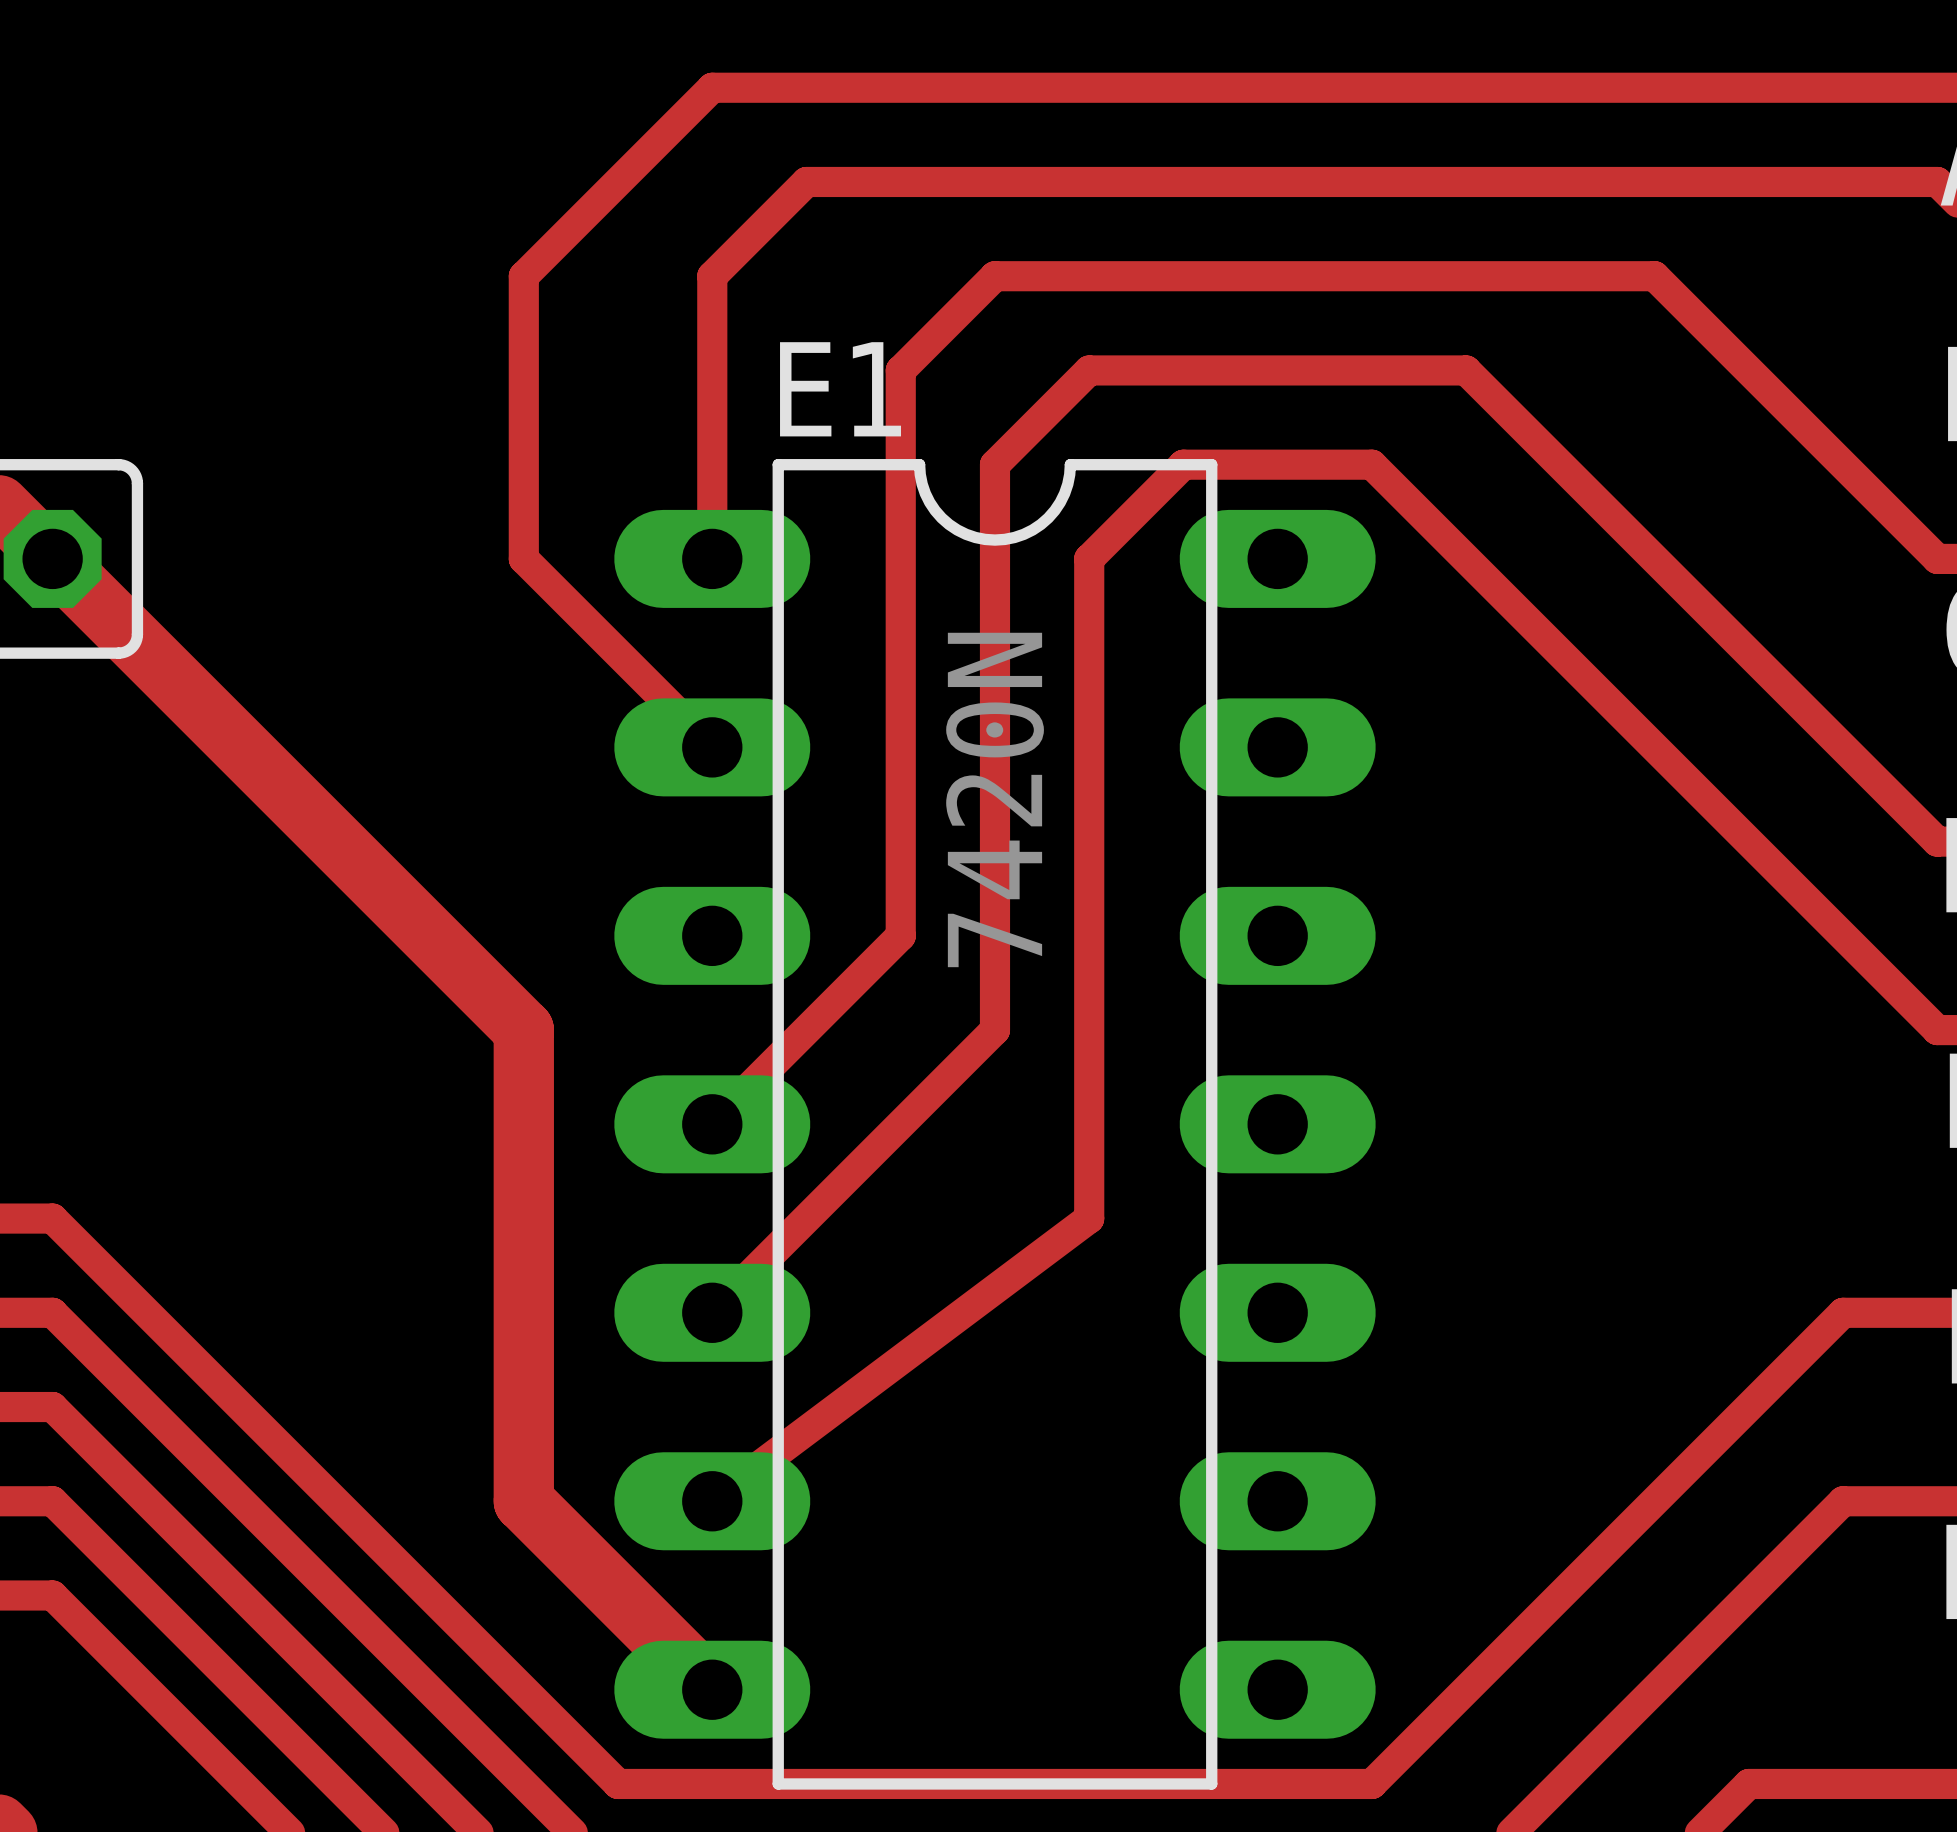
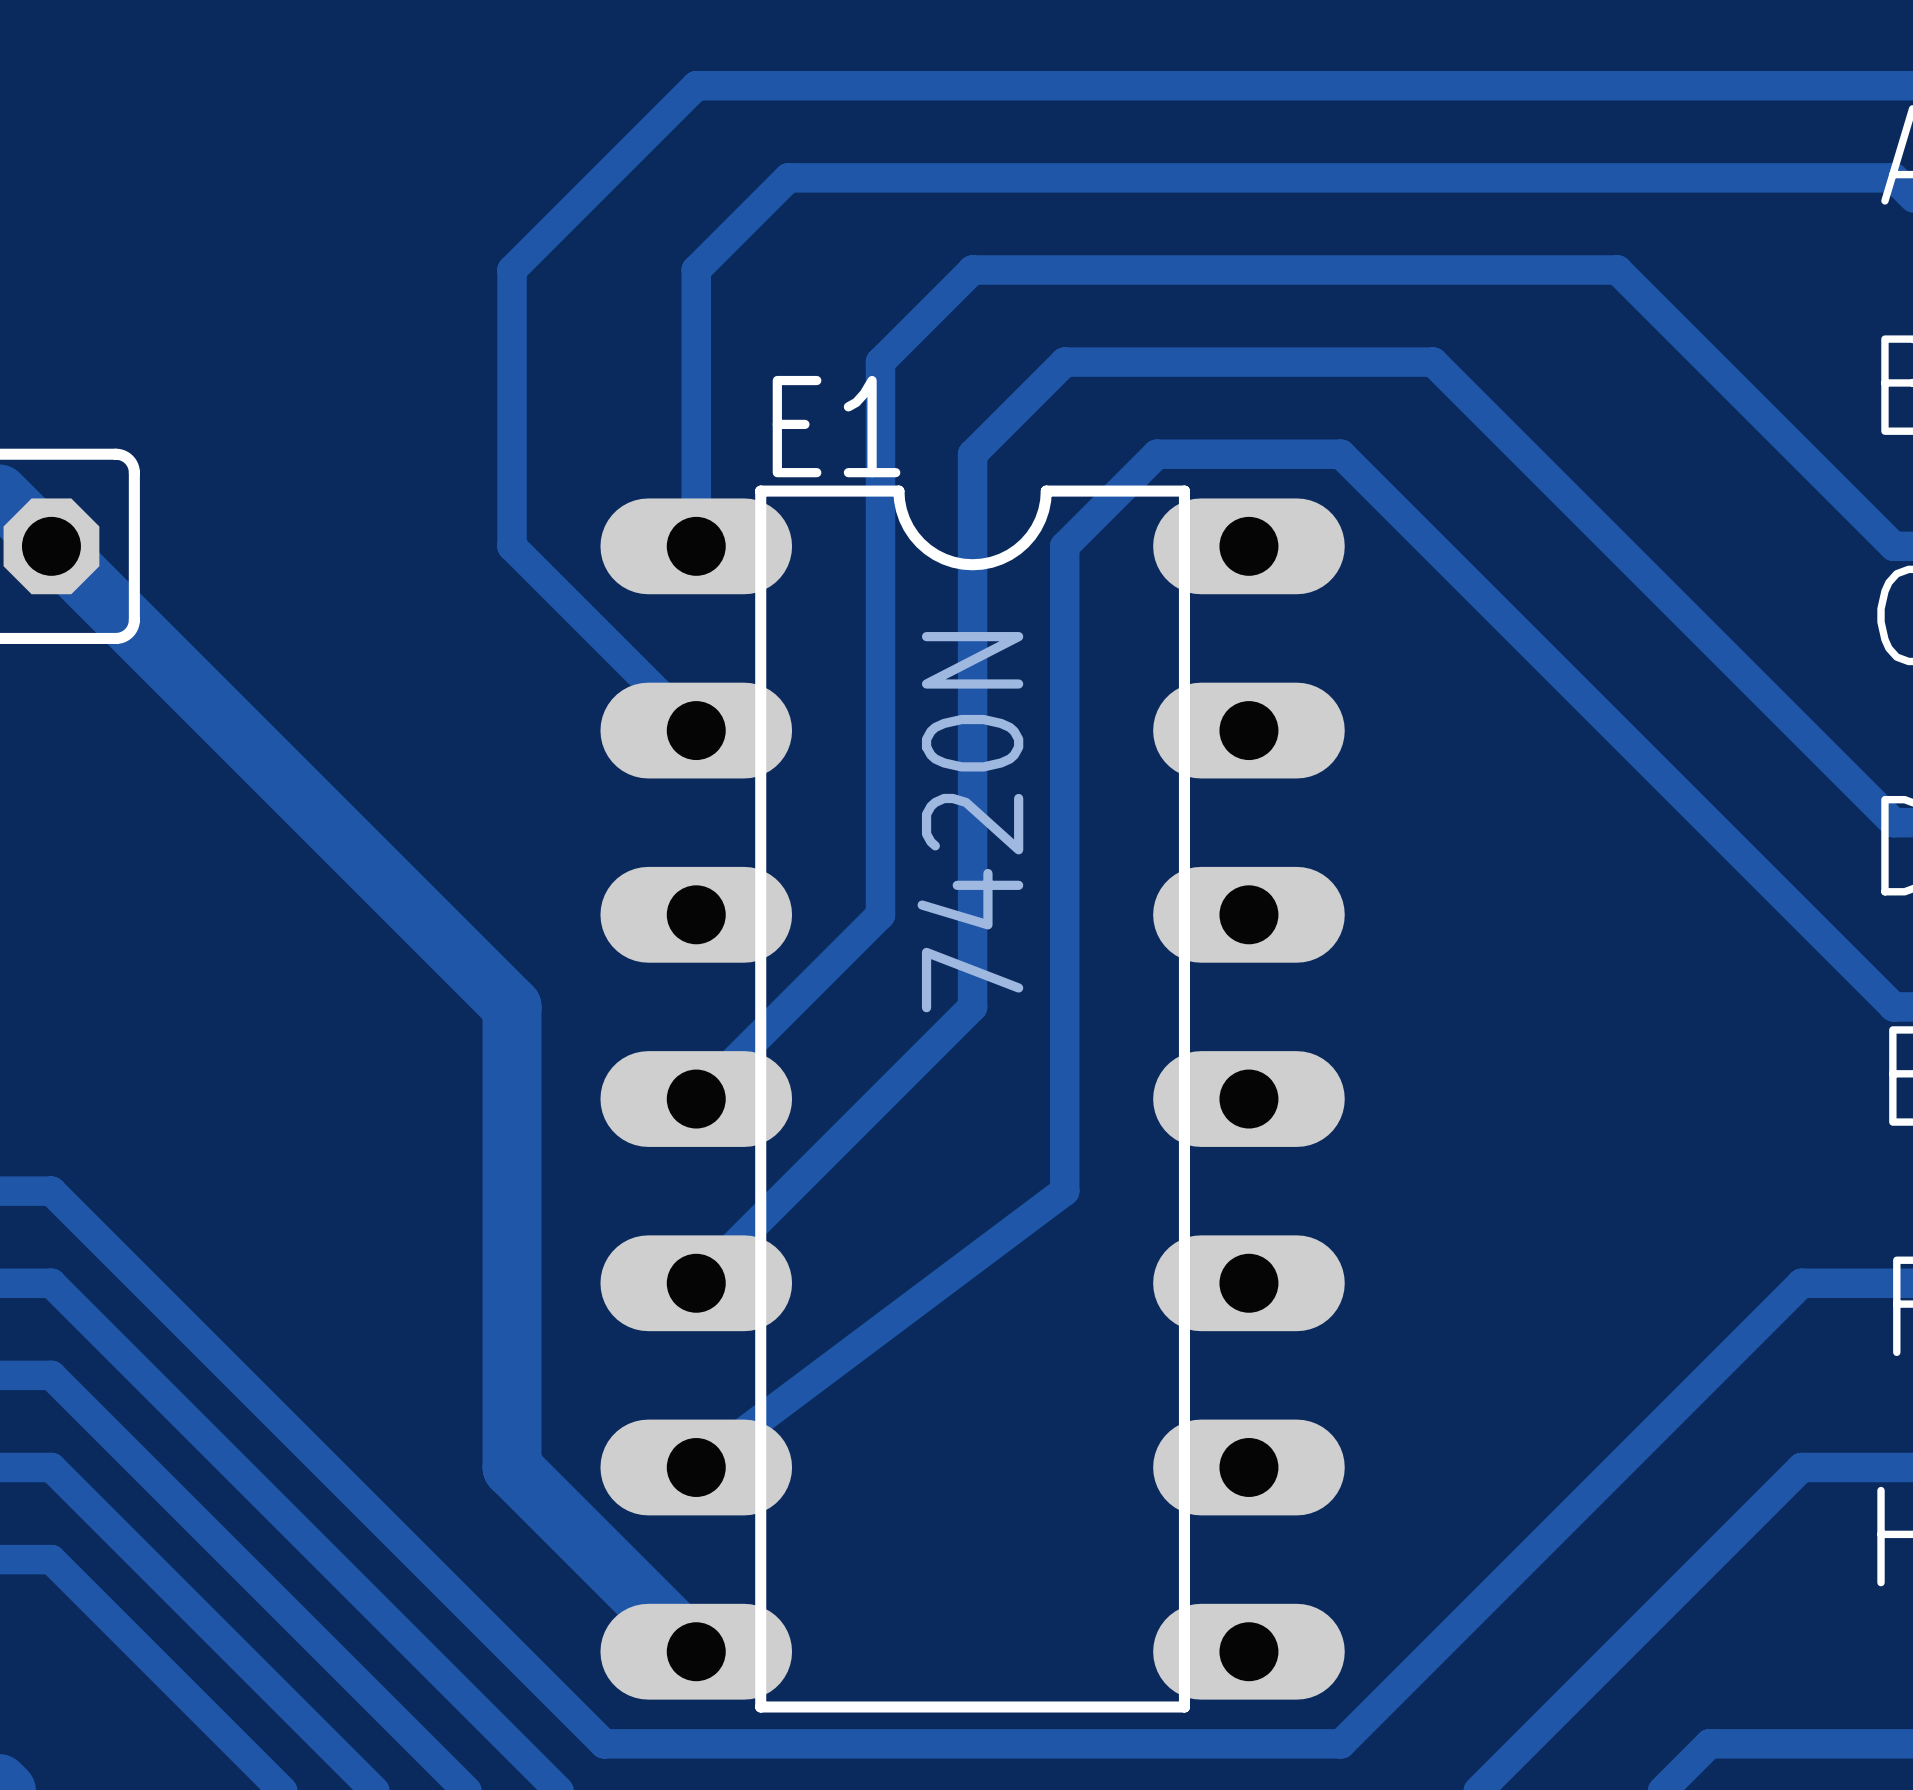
E1 name position: E1 (840, 389) -> E1 (836, 426)
E1 footprint: [614, 459, 1376, 1790] -> [600, 485, 1345, 1713]

